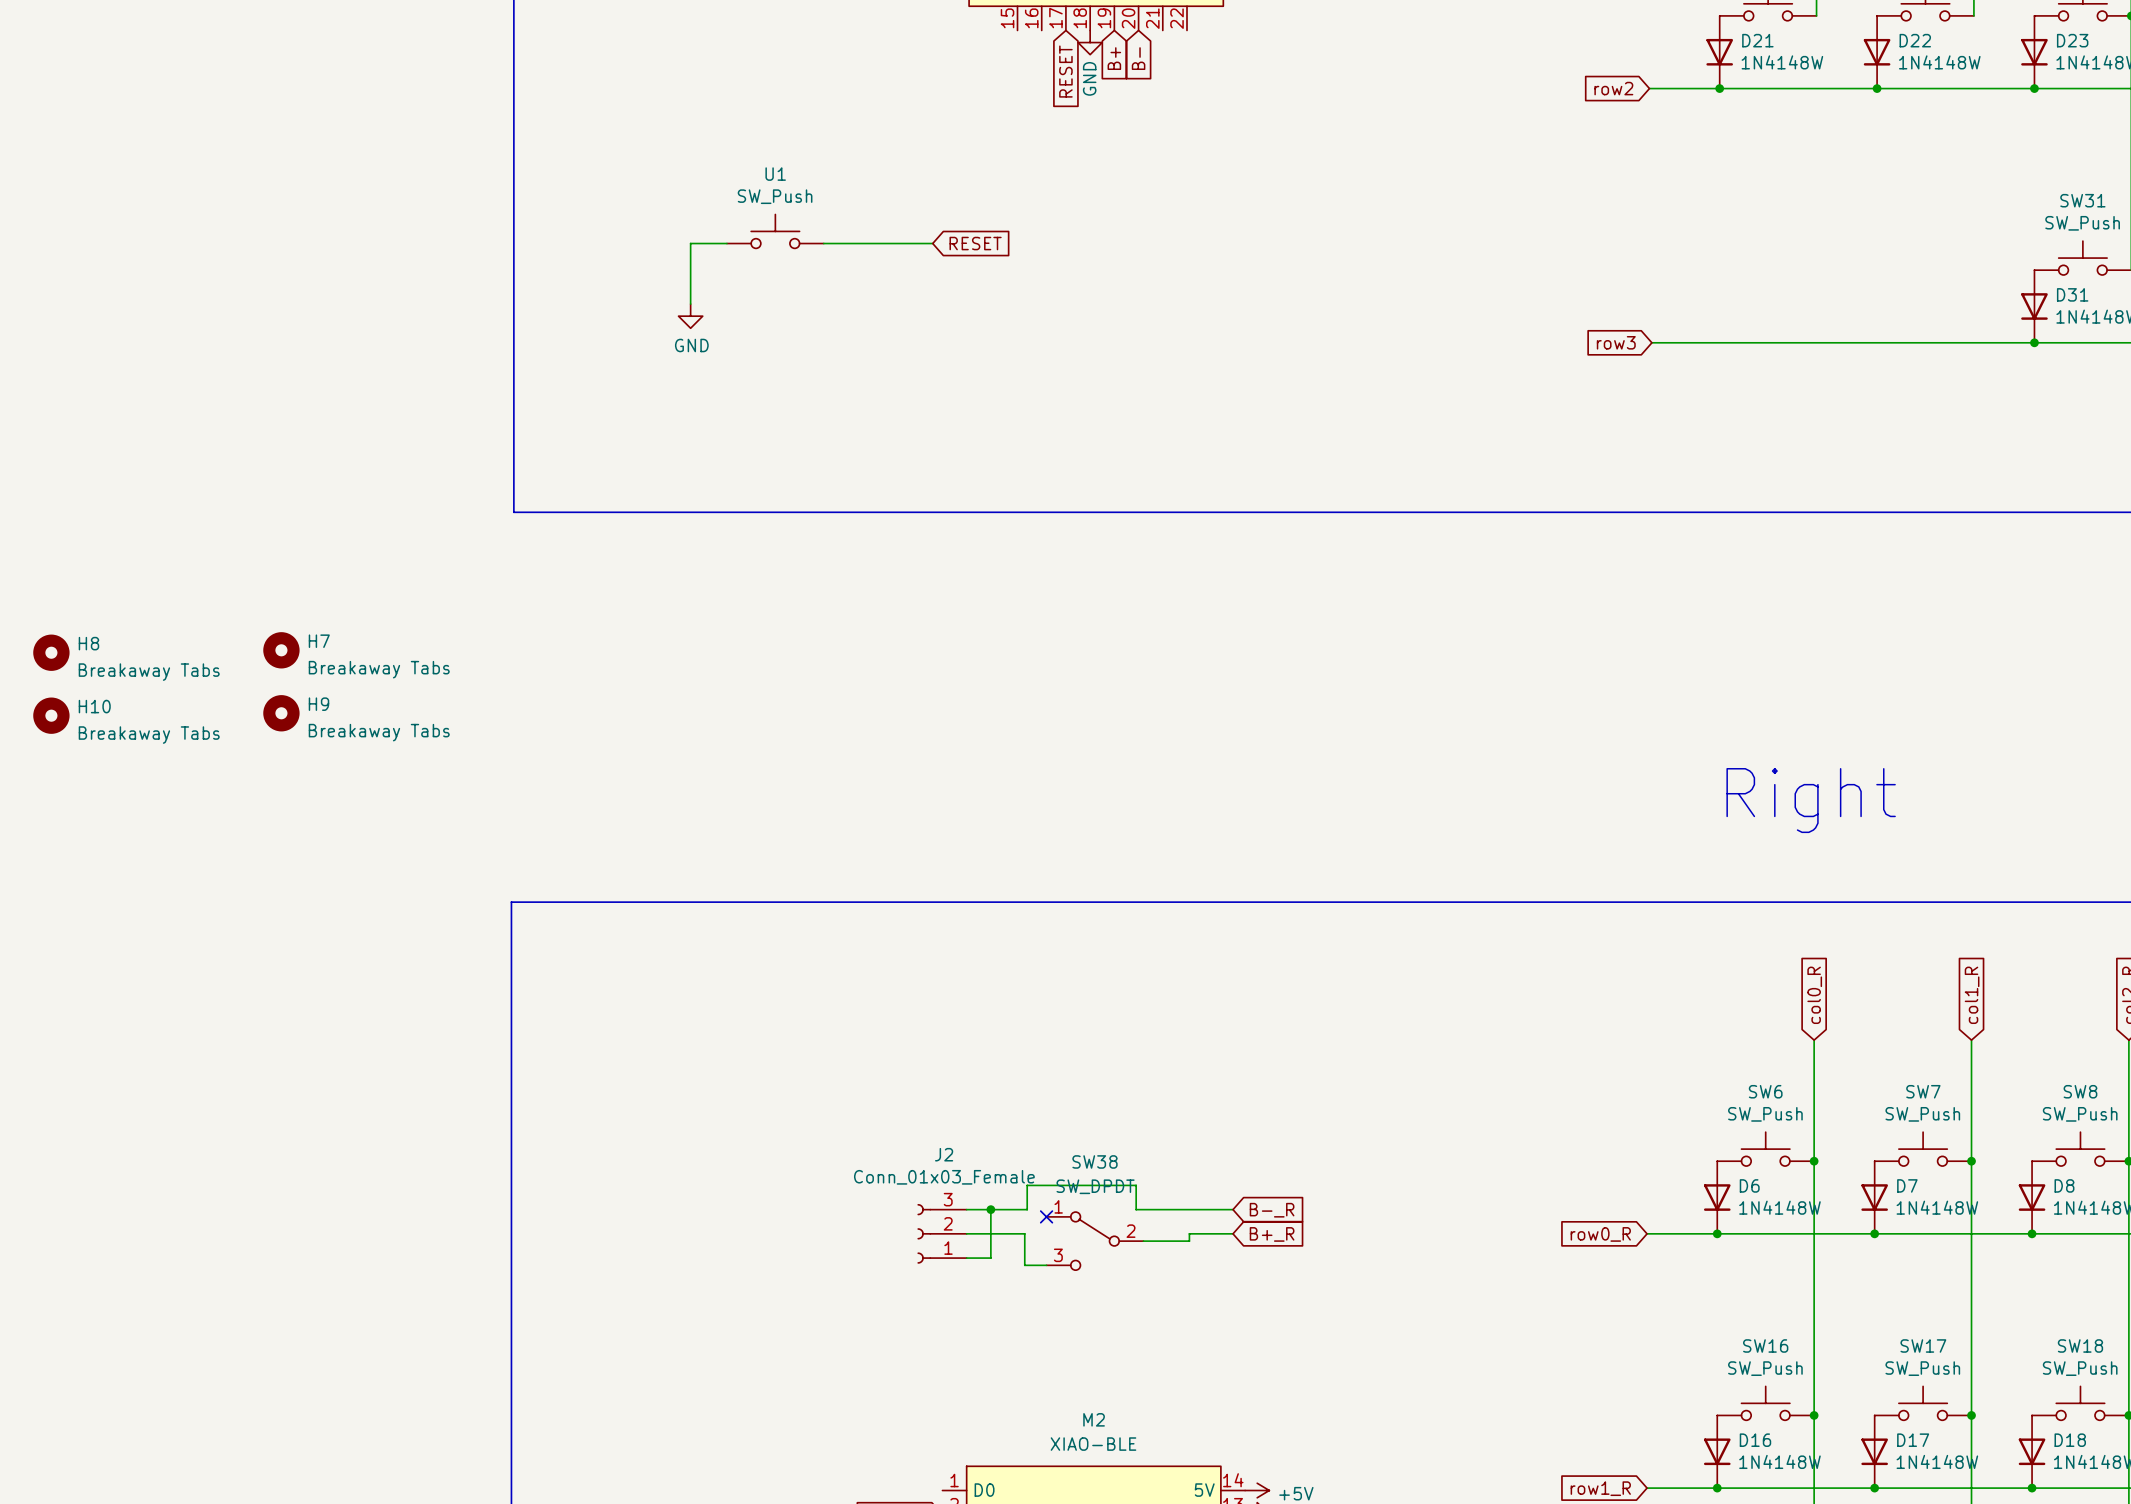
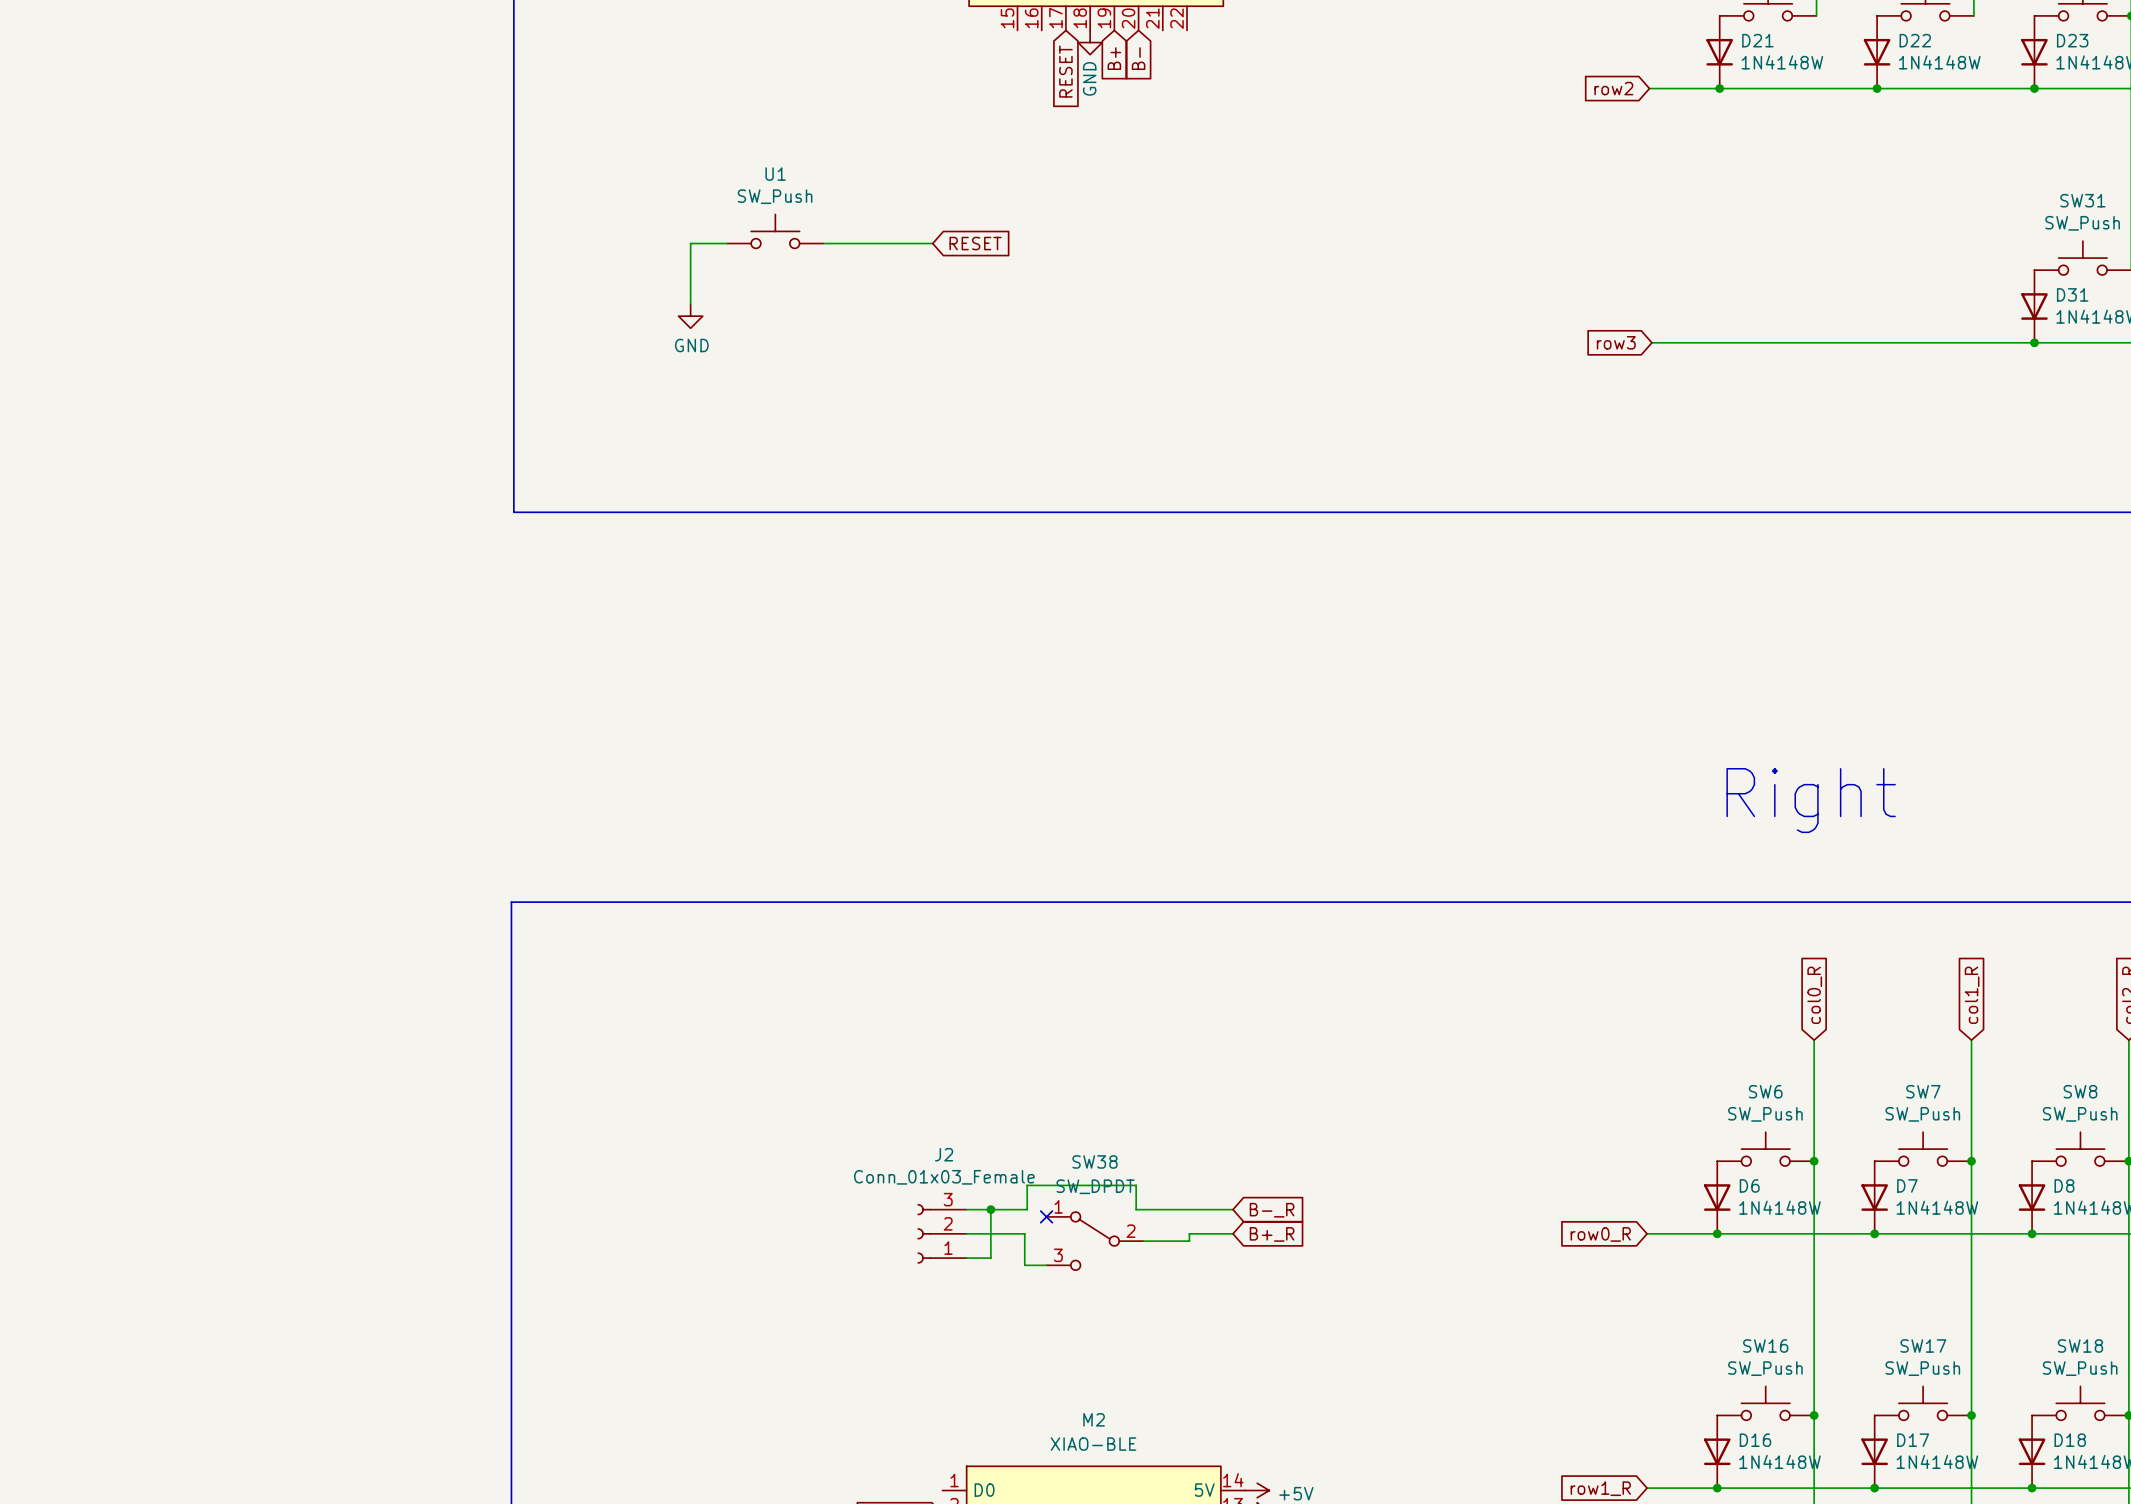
H7: Breakaway Tabs (281, 650) -> none
H8: Breakaway Tabs (51, 652) -> none
H9: Breakaway Tabs (281, 713) -> none
H10: Breakaway Tabs (51, 715) -> none

